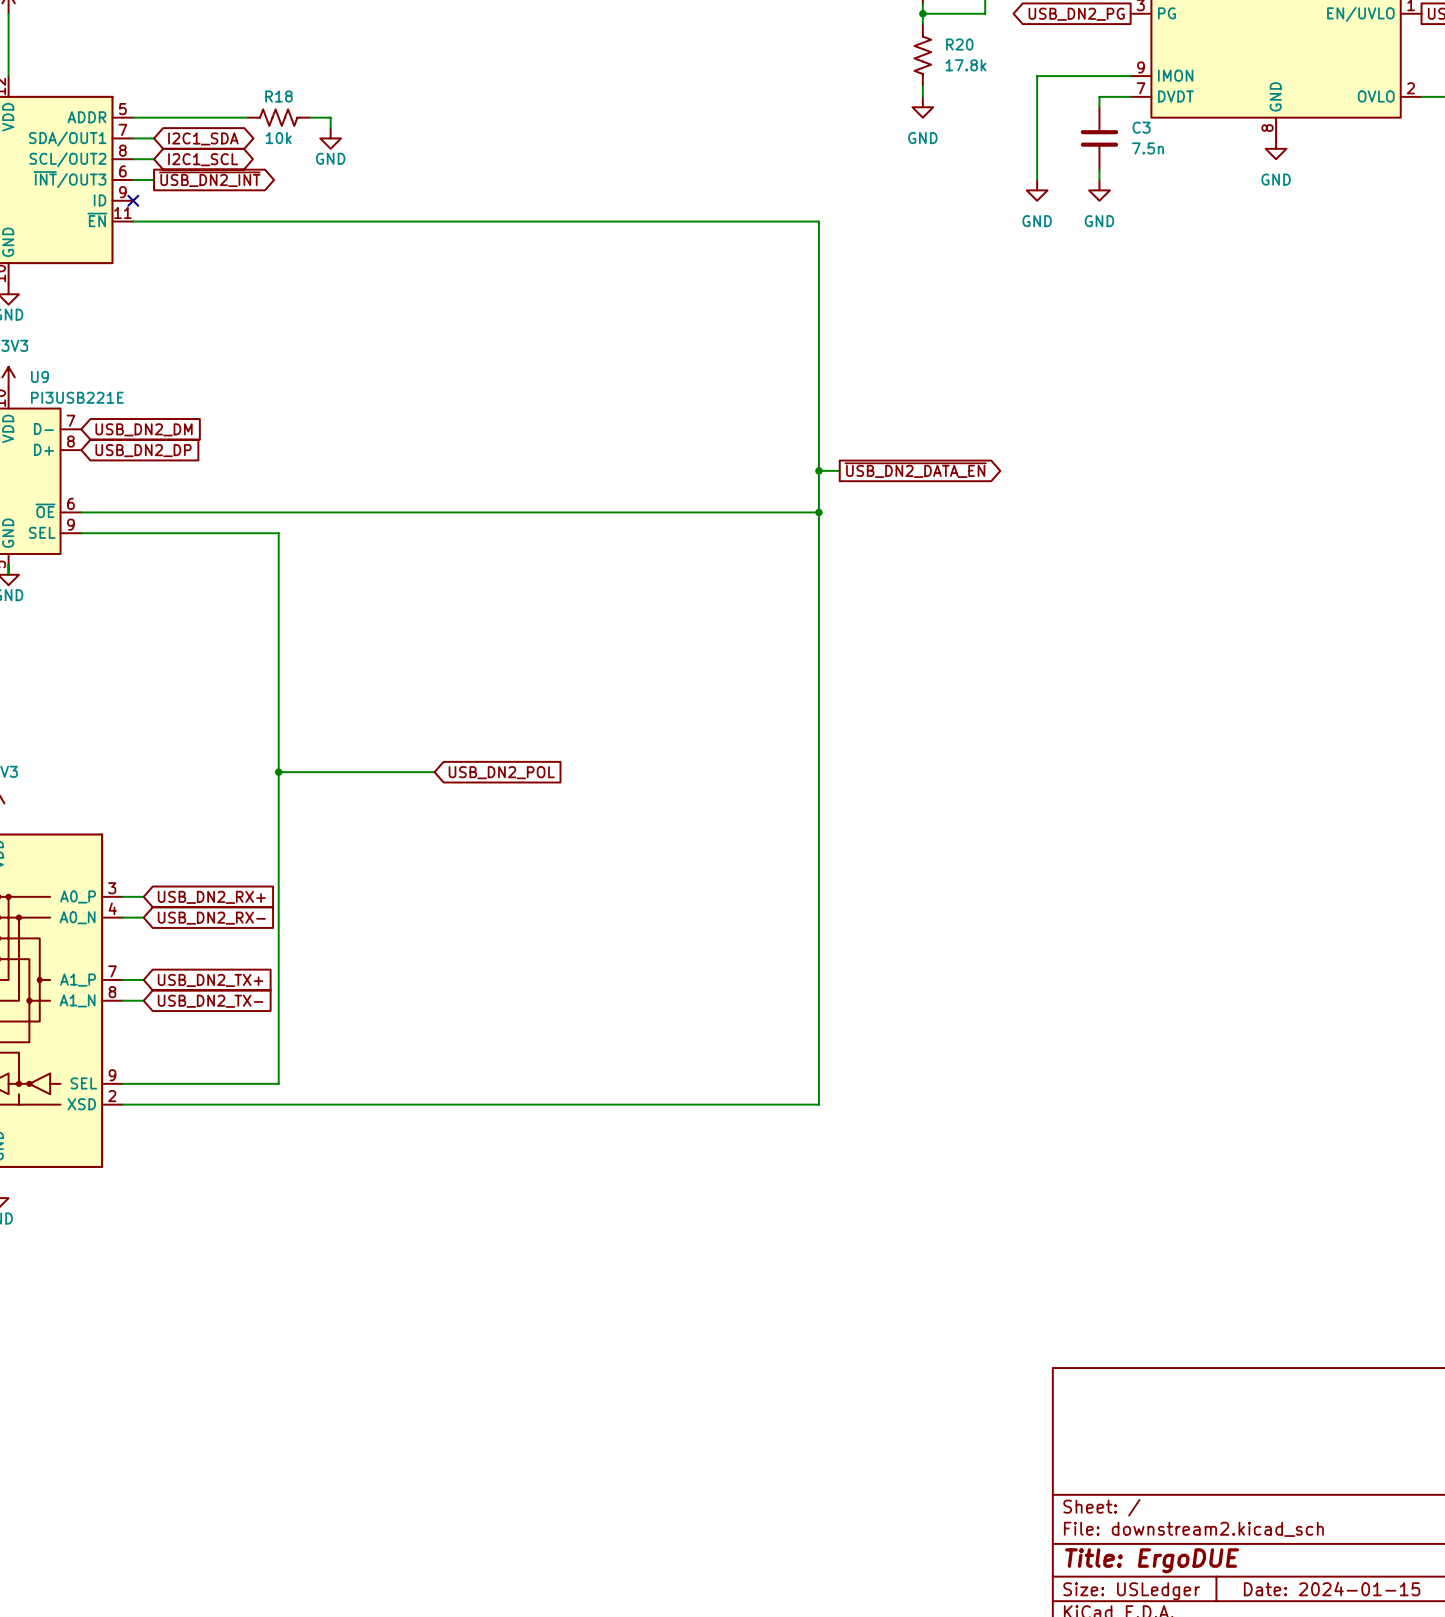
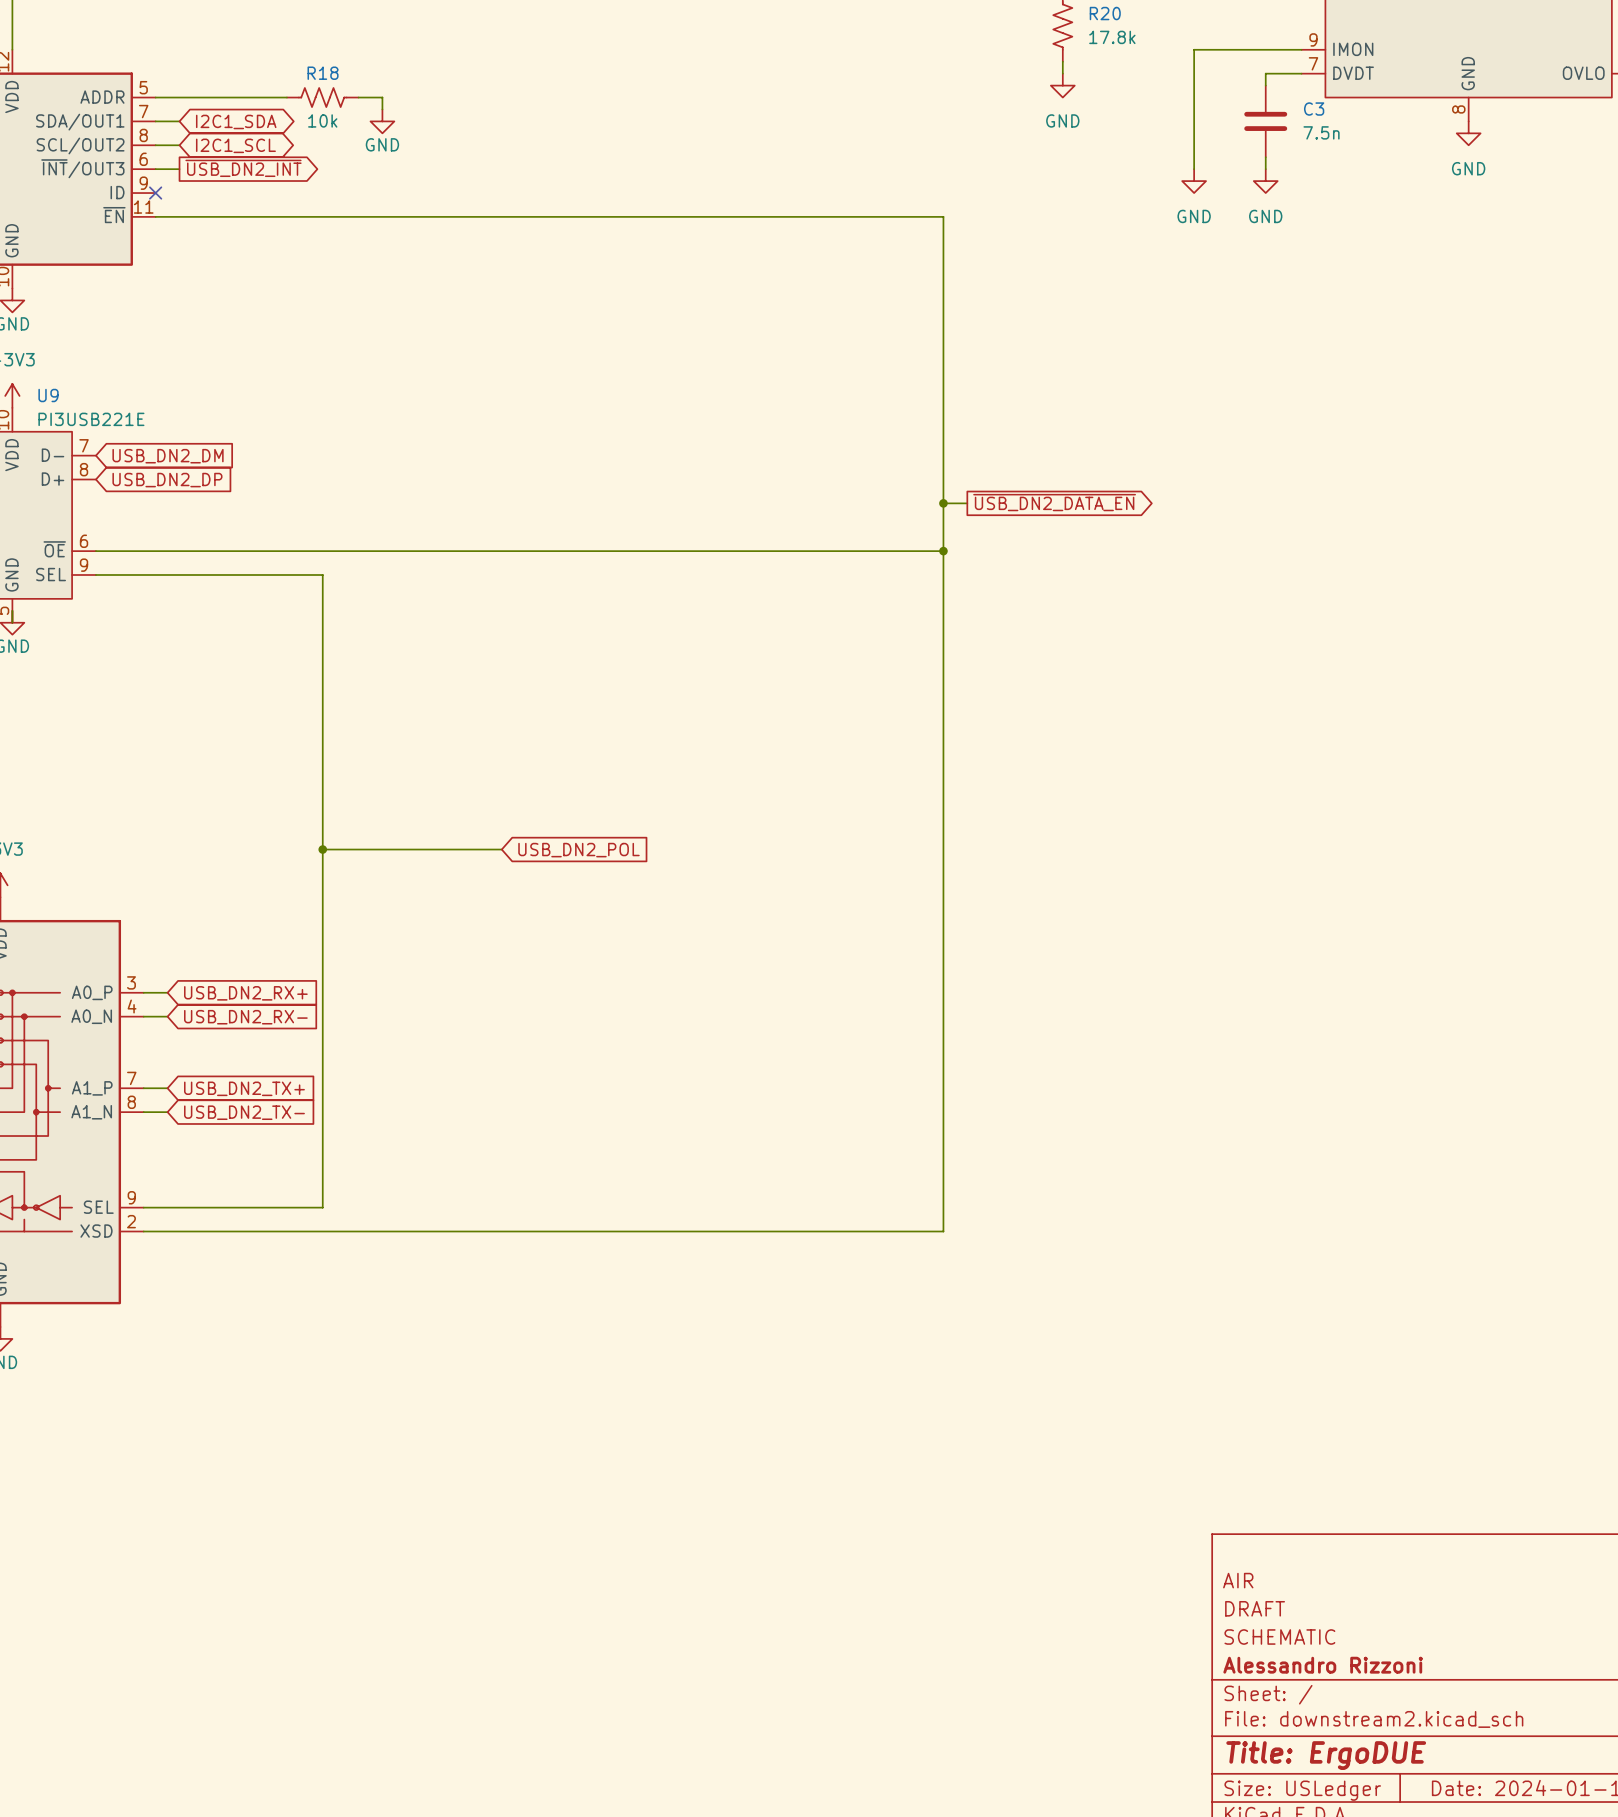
title block: none -> AIR (1238, 1580)
title block: none -> DRAFT (1255, 1608)
title block: none -> SCHEMATIC (1279, 1637)
title block: none -> Alessandro Rizzoni (1323, 1665)

